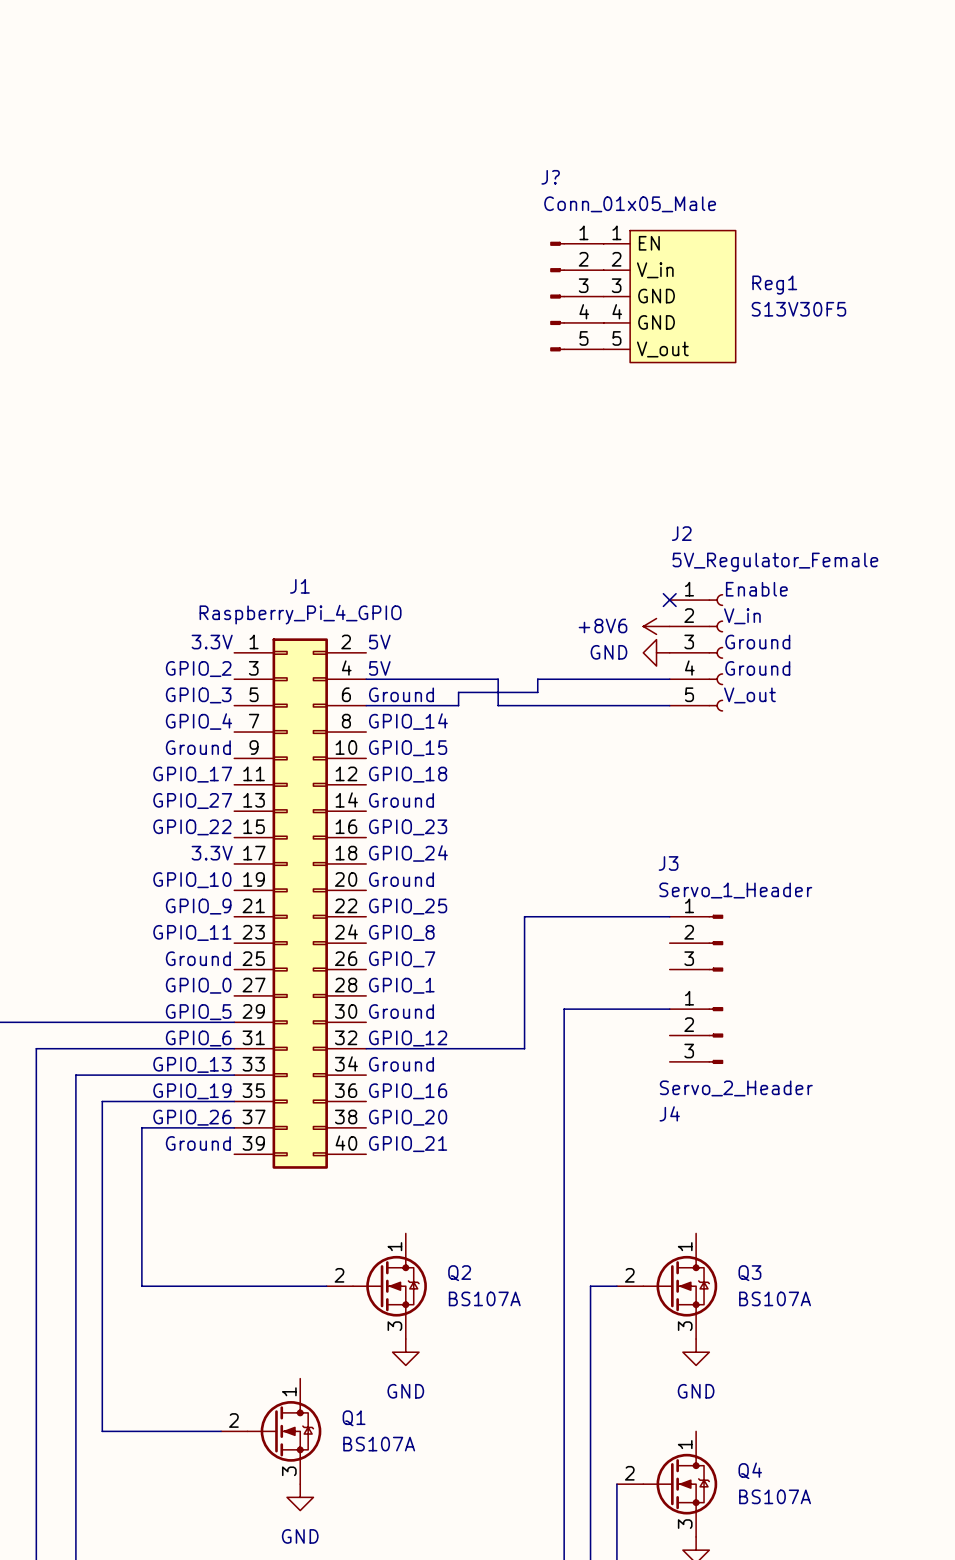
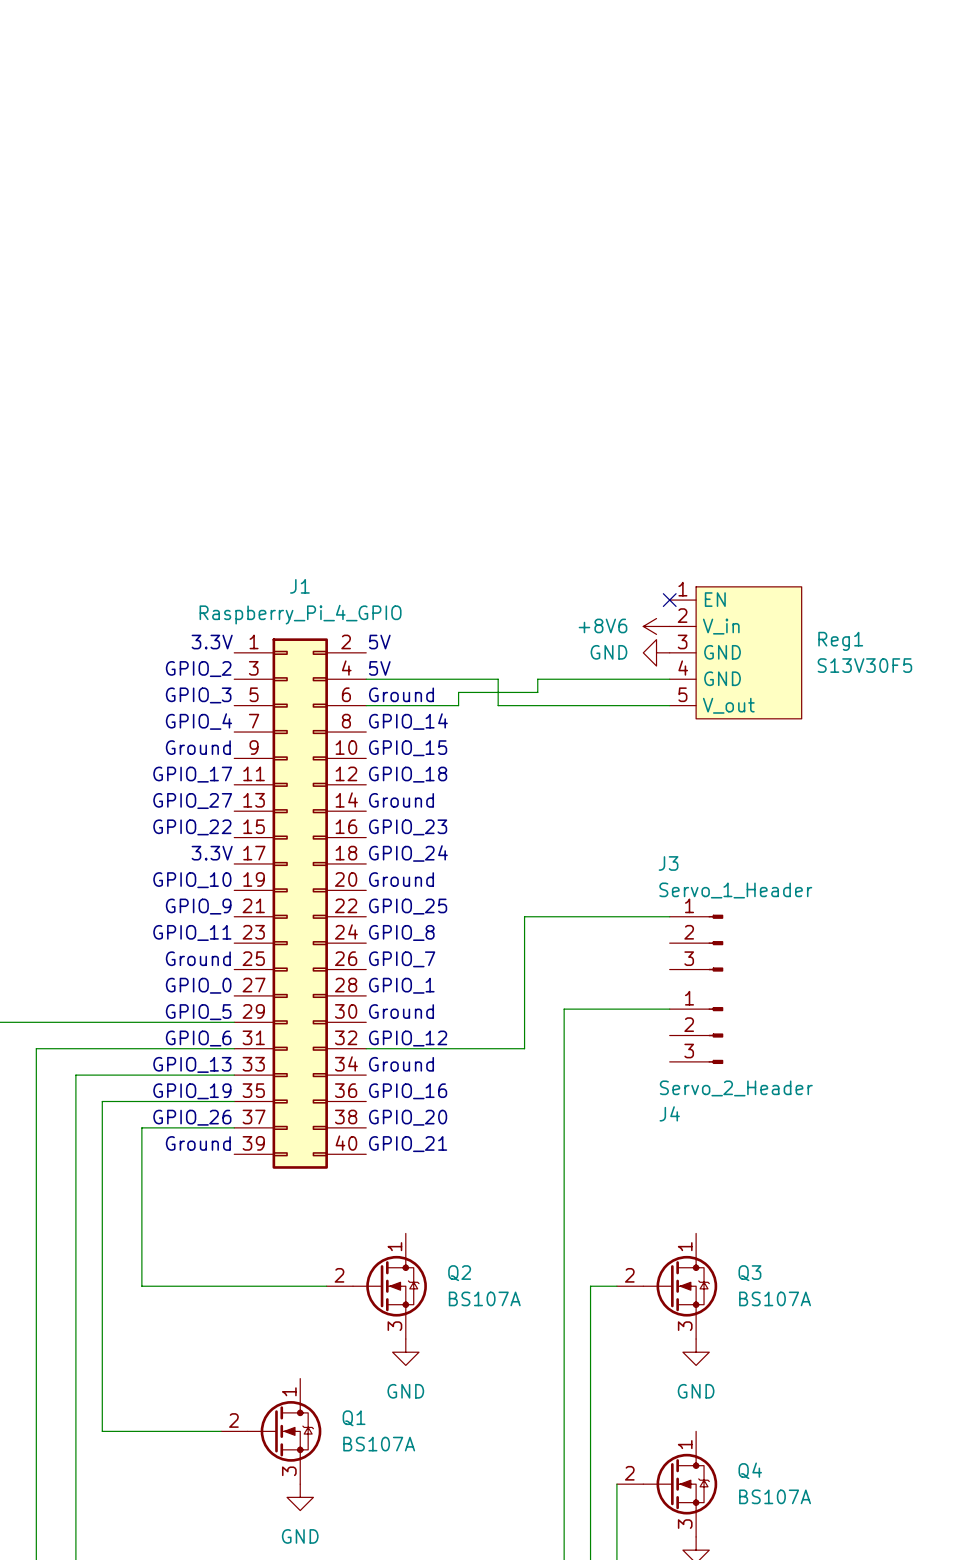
J?: Conn_01x05_Male (576, 296) -> none
Reg1 position: (669, 296) -> (735, 652)
text: Enable (756, 589) -> none
text: V_in (742, 616) -> none
text: Ground (757, 642) -> none
J2: 5V_Regulator_Female (696, 652) -> none
text: Ground (757, 668) -> none
text: V_out (749, 695) -> none

